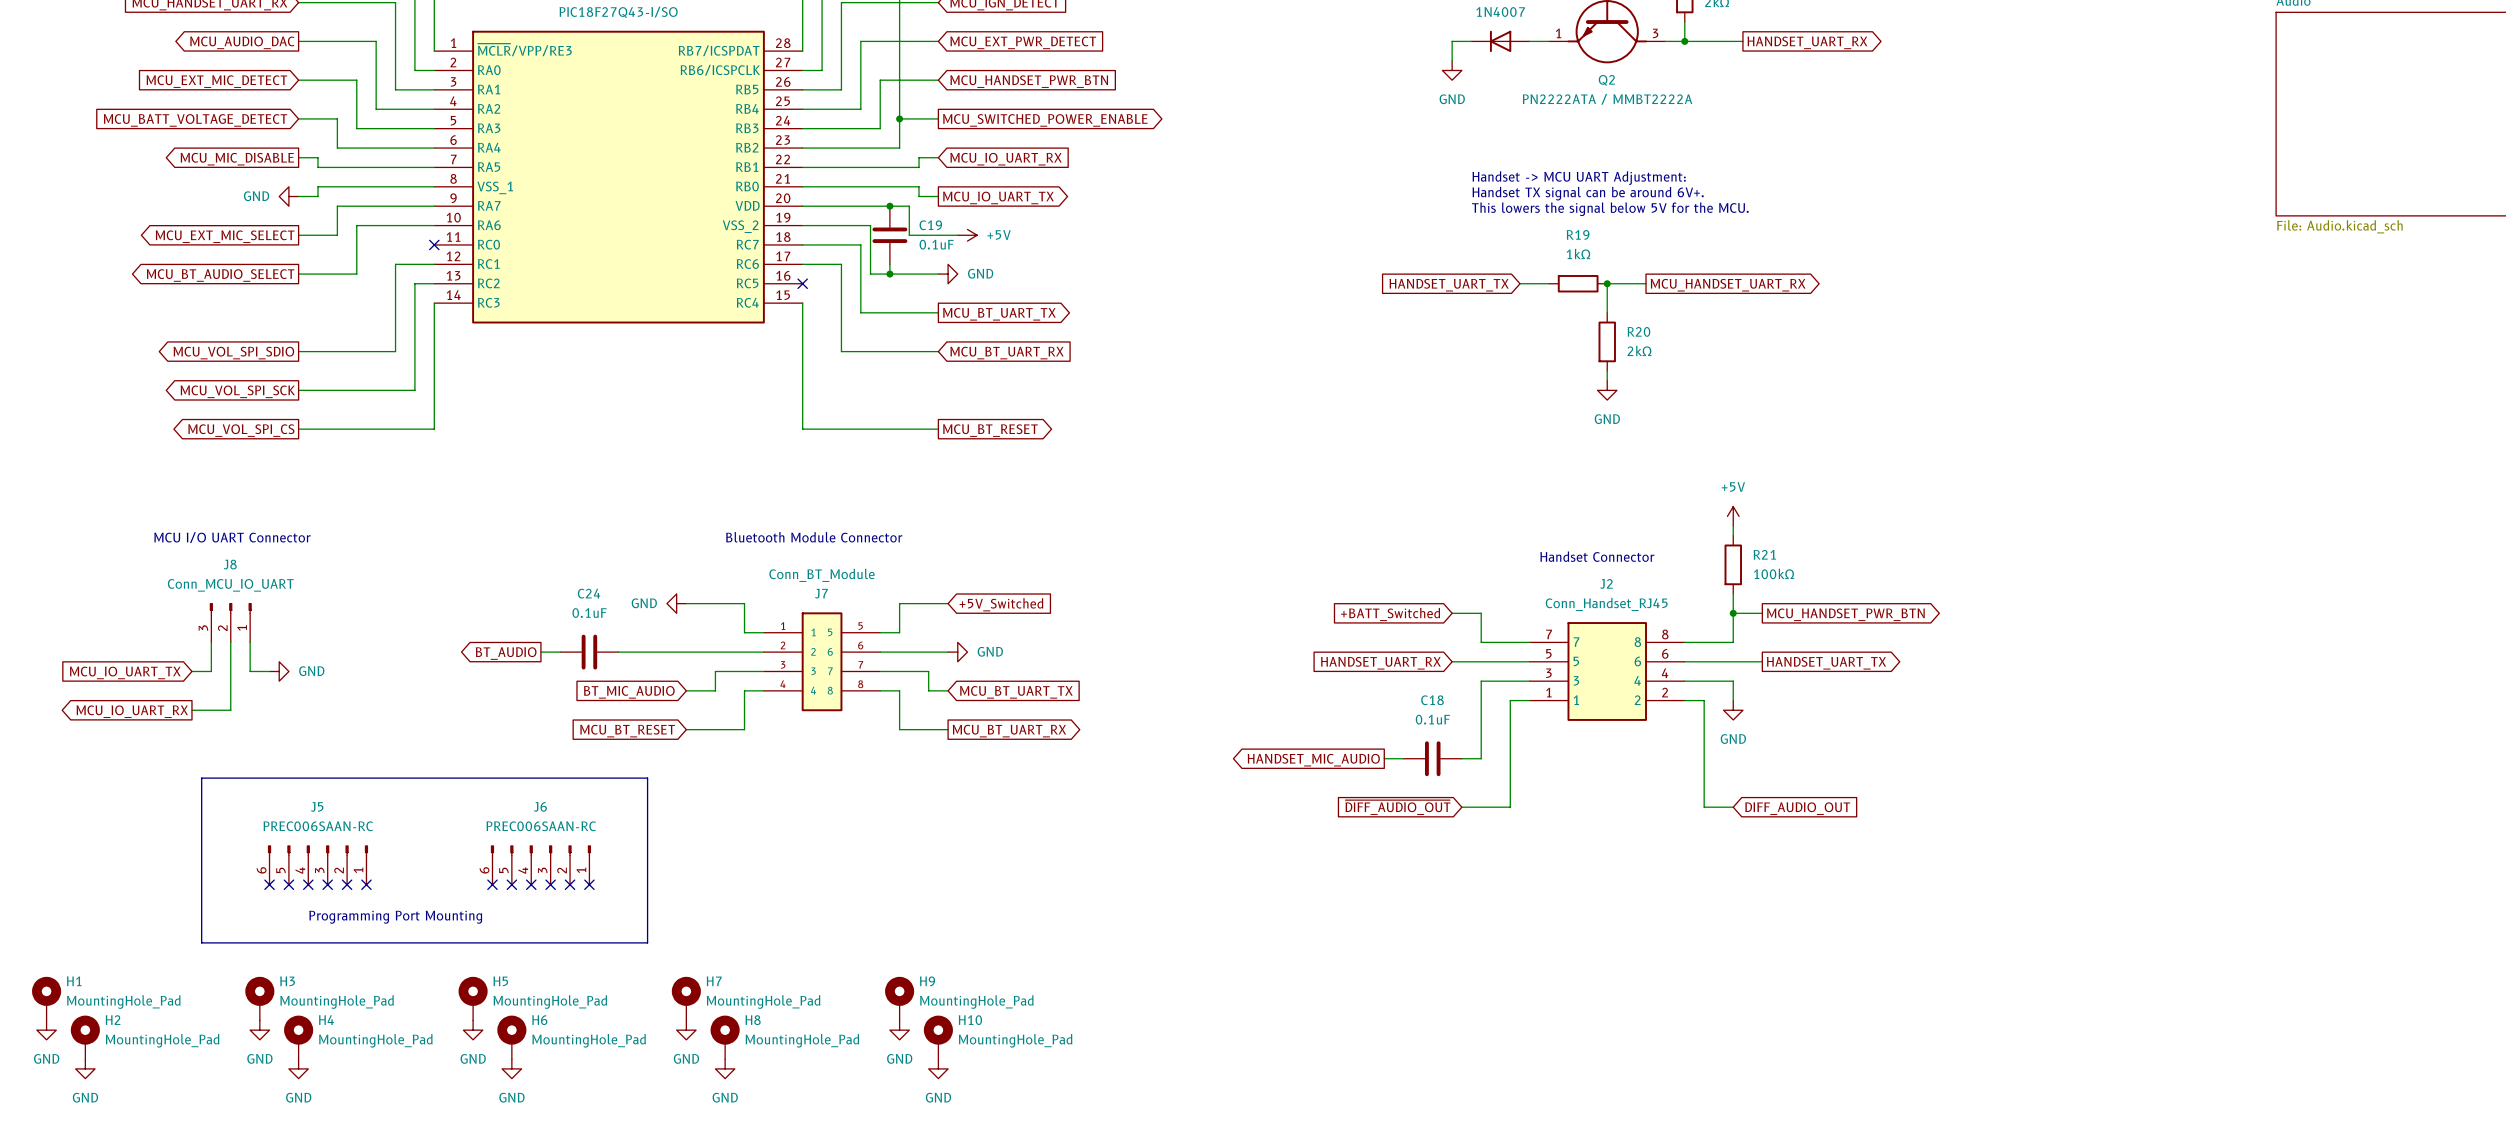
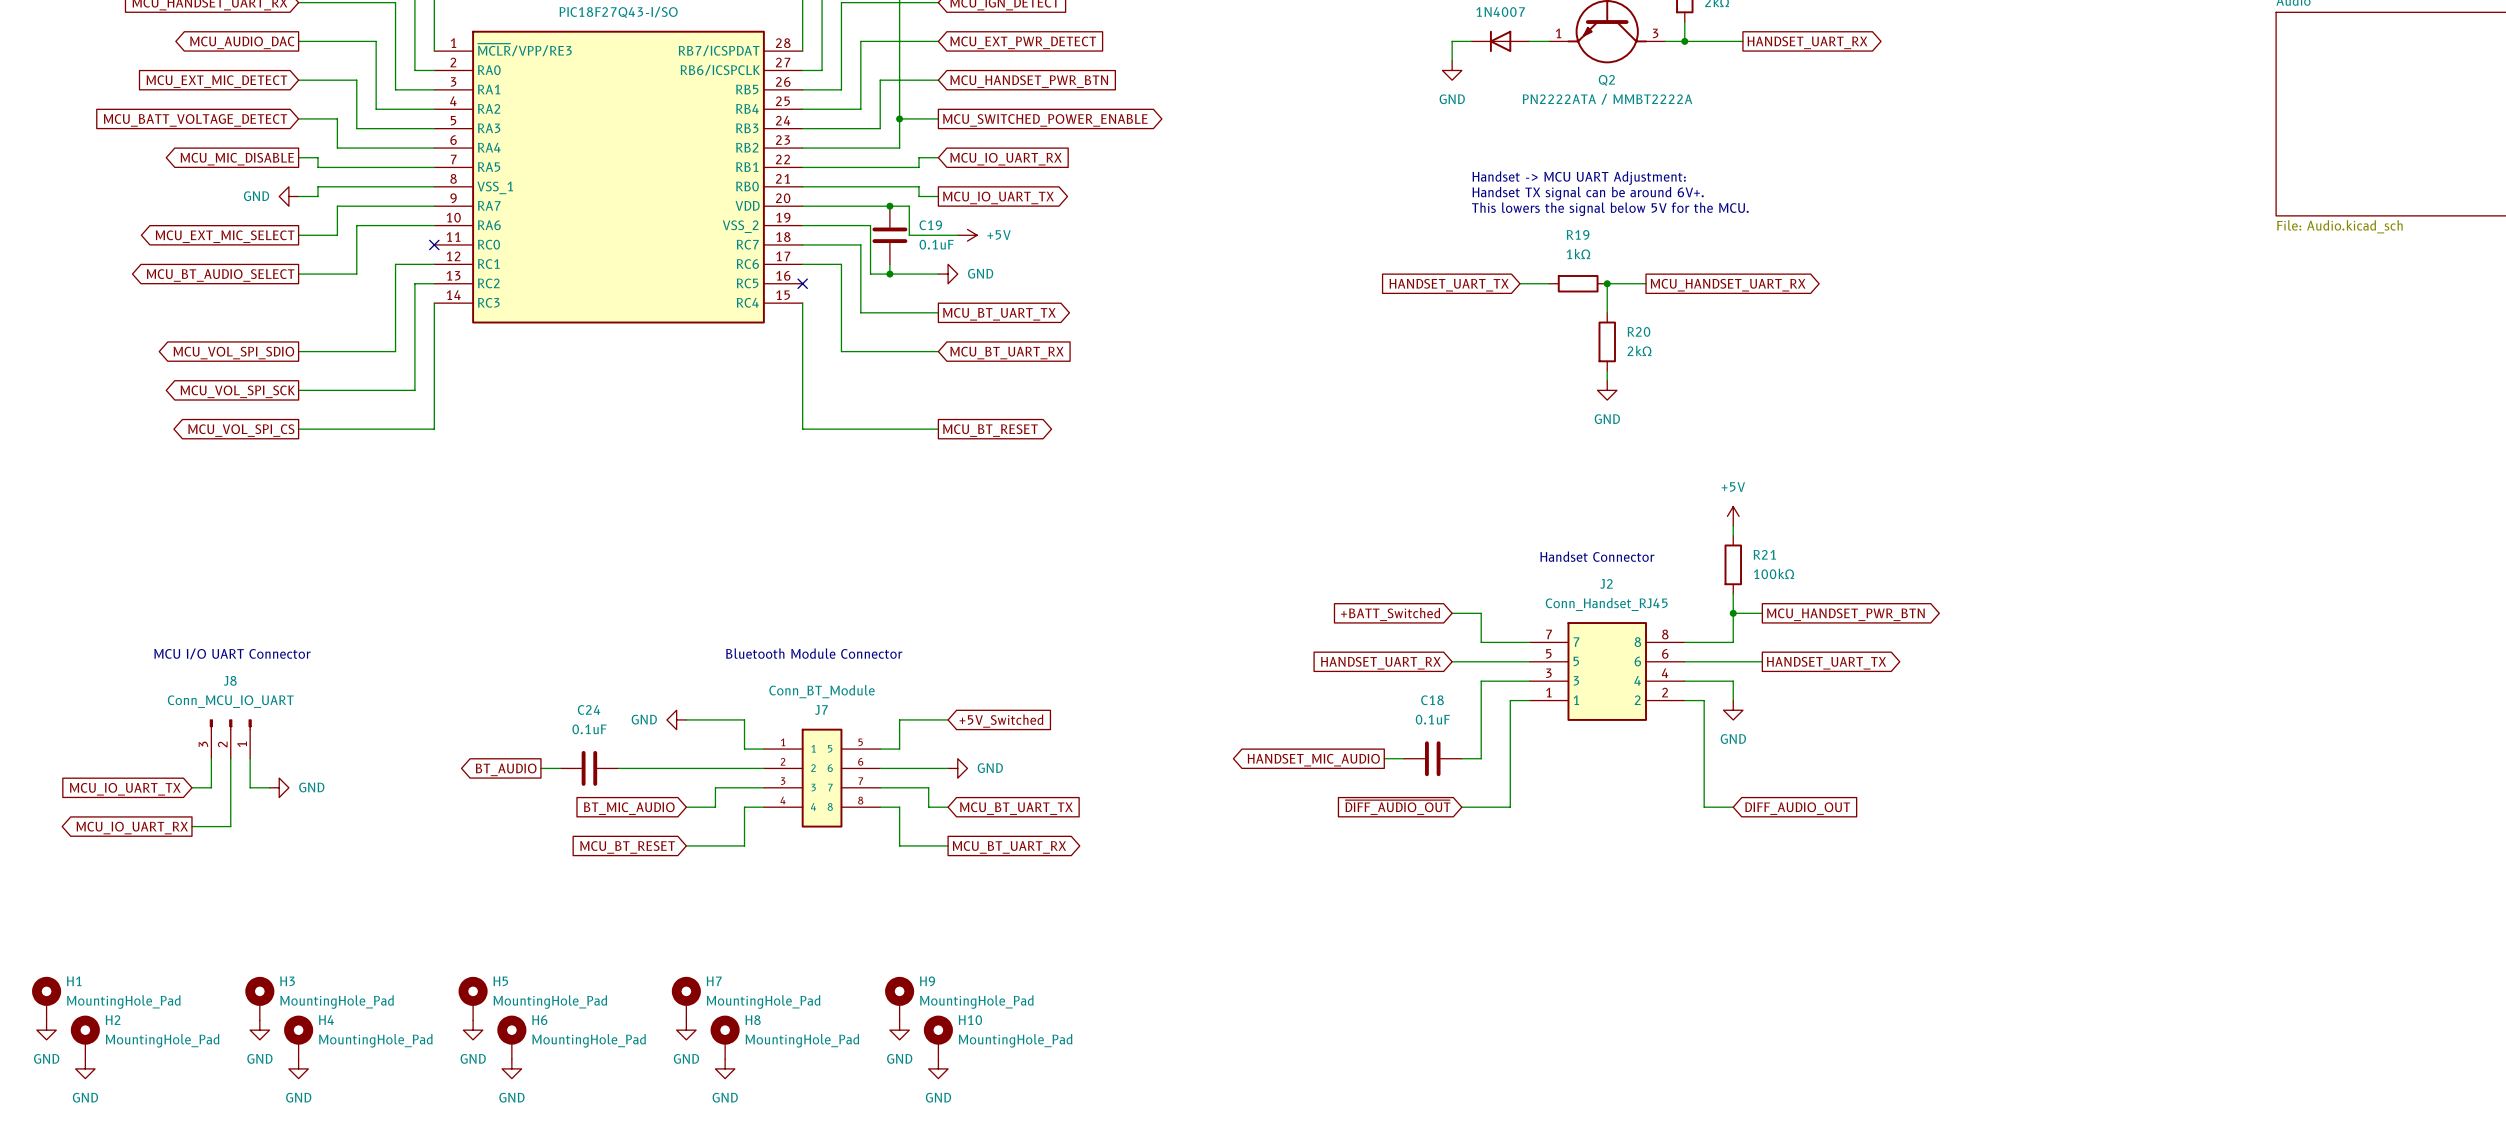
text position: MCU I/O UART Connector (232, 537) -> MCU I/O UART Connector (232, 653)
text position: Bluetooth Module Connector (814, 537) -> Bluetooth Module Connector (814, 653)
power symbol position: GND (676, 603) -> GND (676, 719)
wire: (686, 603) (744, 603) (744, 632) (763, 632) -> none
wire: (948, 603) (899, 603) (899, 632) (880, 632) -> none
global label position: +5V_Switched (1001, 604) -> +5V_Switched (1001, 721)
J8 position: (230, 622) -> (230, 739)
wire: (211, 642) (211, 671) (191, 671) -> (211, 758) (211, 787) (191, 787)
wire: (230, 642) (230, 710) (191, 710) -> (230, 758) (230, 826) (191, 826)
wire: (250, 642) (250, 671) (269, 671) -> (250, 758) (250, 787) (269, 787)
wire: (540, 652) (560, 652) -> (540, 768) (560, 768)
C24 position: (589, 652) -> (589, 768)
wire: (618, 652) (763, 652) -> (618, 768) (763, 768)
wire: (880, 652) (948, 652) -> (880, 768) (948, 768)
power symbol position: GND (957, 652) -> GND (957, 768)
global label position: BT_AUDIO (506, 653) -> BT_AUDIO (506, 769)
J7 position: (822, 661) -> (822, 778)
power symbol position: GND (279, 671) -> GND (279, 787)
wire: (763, 671) (715, 671) (715, 690) (686, 690) -> (763, 787) (715, 787) (715, 807) (686, 807)
wire: (880, 671) (928, 671) (928, 690) (948, 690) -> (880, 787) (928, 787) (928, 807) (948, 807)
global label position: MCU_IO_UART_TX (125, 672) -> MCU_IO_UART_TX (125, 789)
wire: (763, 690) (744, 690) (744, 719) -> (686, 719) (744, 719)
wire: (880, 690) (899, 690) (899, 719) -> (948, 719) (899, 719)
global label position: BT_MIC_AUDIO (629, 692) -> BT_MIC_AUDIO (629, 808)
global label position: MCU_BT_UART_TX (1016, 692) -> MCU_BT_UART_TX (1016, 808)
global label position: MCU_IO_UART_RX (132, 711) -> MCU_IO_UART_RX (132, 828)
wire: (686, 729) (744, 729) -> (763, 749) (744, 749) (744, 729)
wire: (899, 729) (948, 729) -> (899, 729) (899, 749) (880, 749)
global label position: MCU_BT_RESET (627, 731) -> MCU_BT_RESET (627, 847)
global label position: MCU_BT_UART_RX (1009, 731) -> MCU_BT_UART_RX (1009, 847)
line: (201, 778) (647, 778) (647, 942) (201, 942) (201, 778) -> none
wire: none -> (763, 807) (744, 807) (744, 845) (686, 845)
wire: none -> (880, 807) (899, 807) (899, 845) (948, 845)
J5: PREC006SAAN-RC (317, 865) -> none
J6: PREC006SAAN-RC (540, 865) -> none
no-connect mark: (269, 884) -> none
no-connect mark: (288, 884) -> none
no-connect mark: (308, 884) -> none
no-connect mark: (327, 884) -> none
no-connect mark: (347, 884) -> none
no-connect mark: (366, 884) -> none
no-connect mark: (492, 884) -> none
no-connect mark: (511, 884) -> none
no-connect mark: (531, 884) -> none
no-connect mark: (550, 884) -> none
no-connect mark: (570, 884) -> none
no-connect mark: (589, 884) -> none
text: Programming Port Mounting (395, 917) -> none

